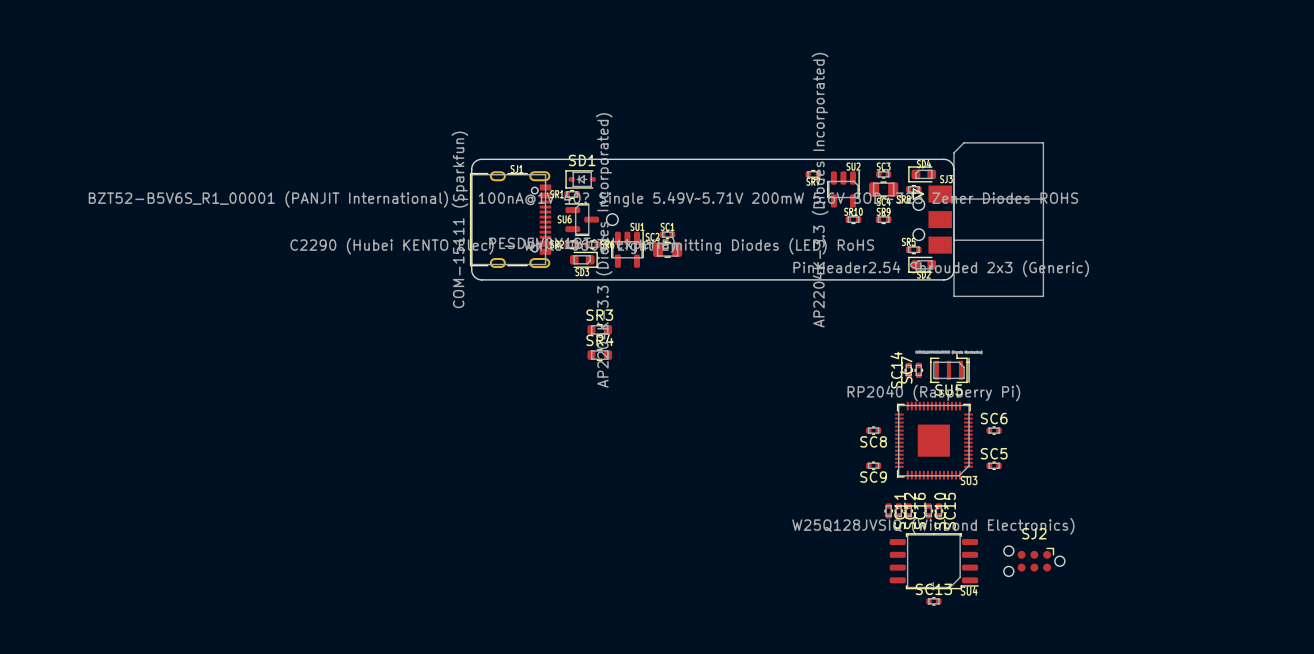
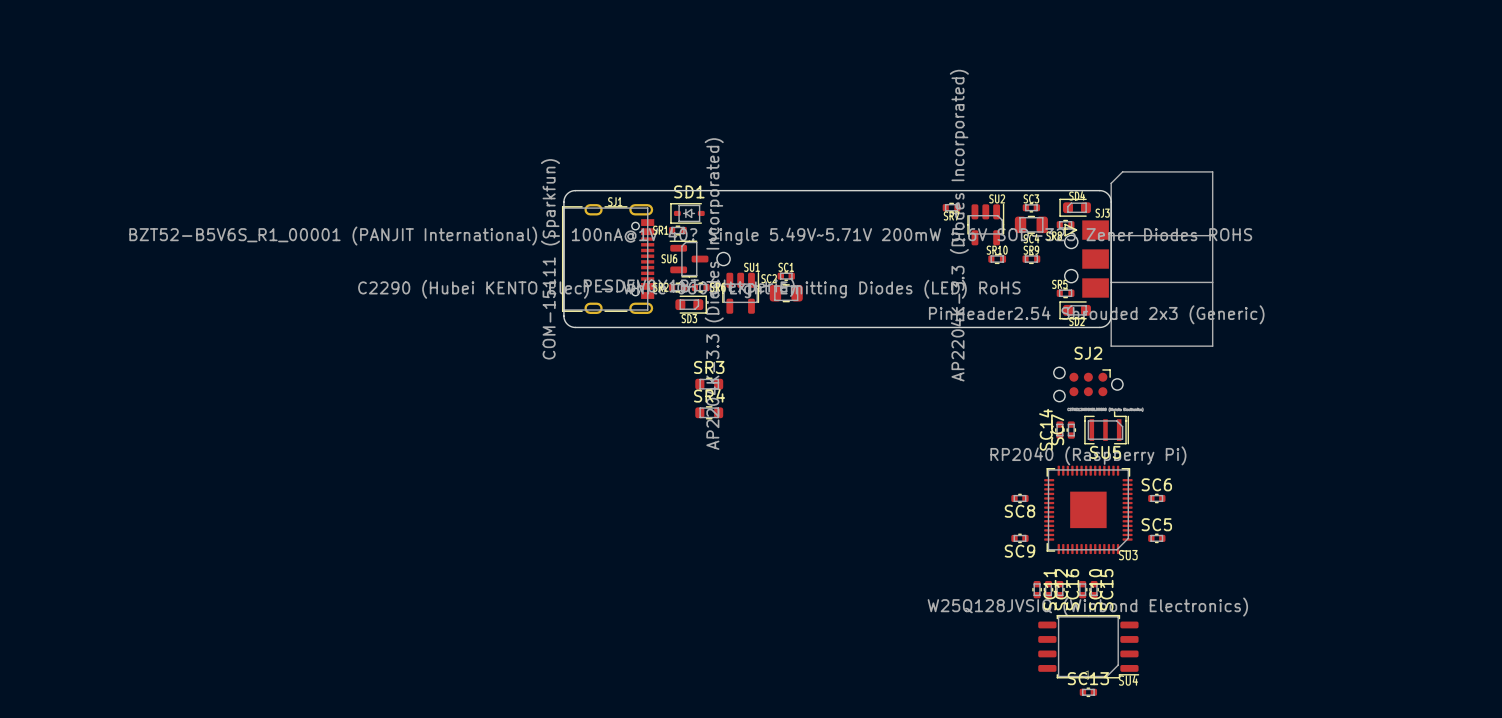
SJ2 position: (1034, 561) -> (1088, 384)

